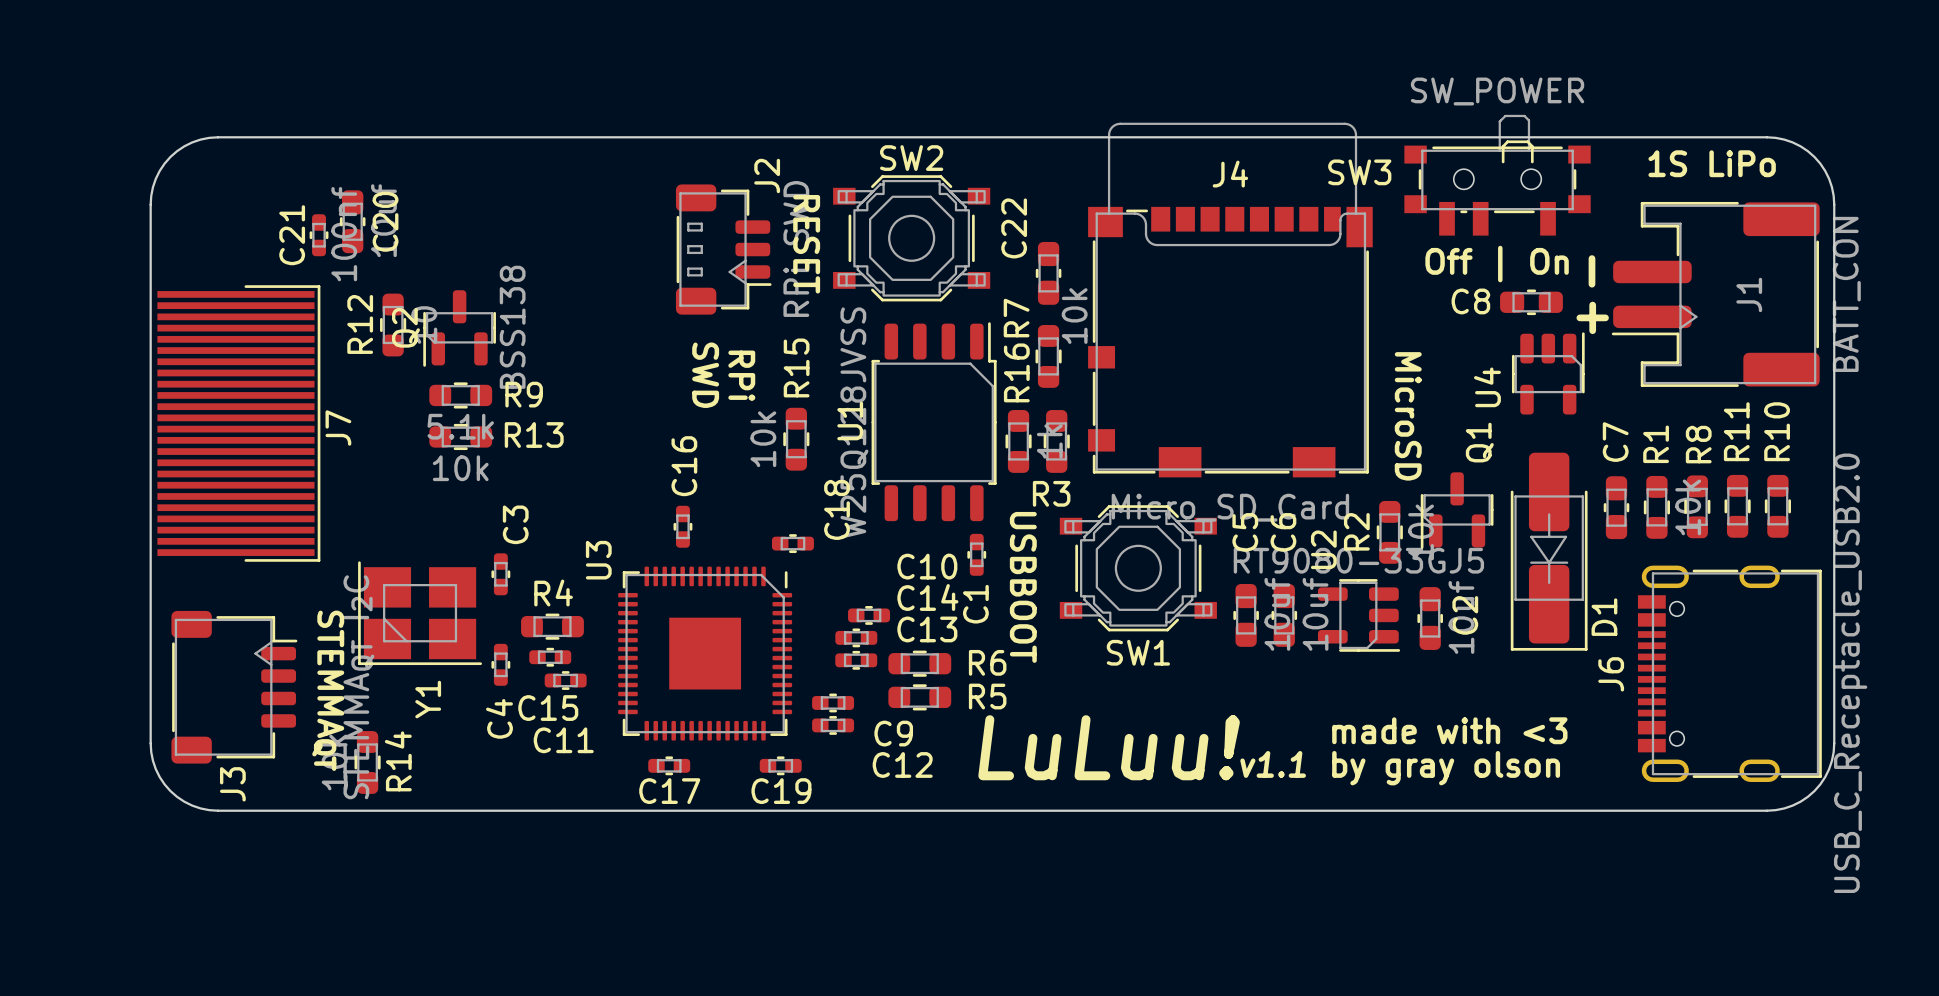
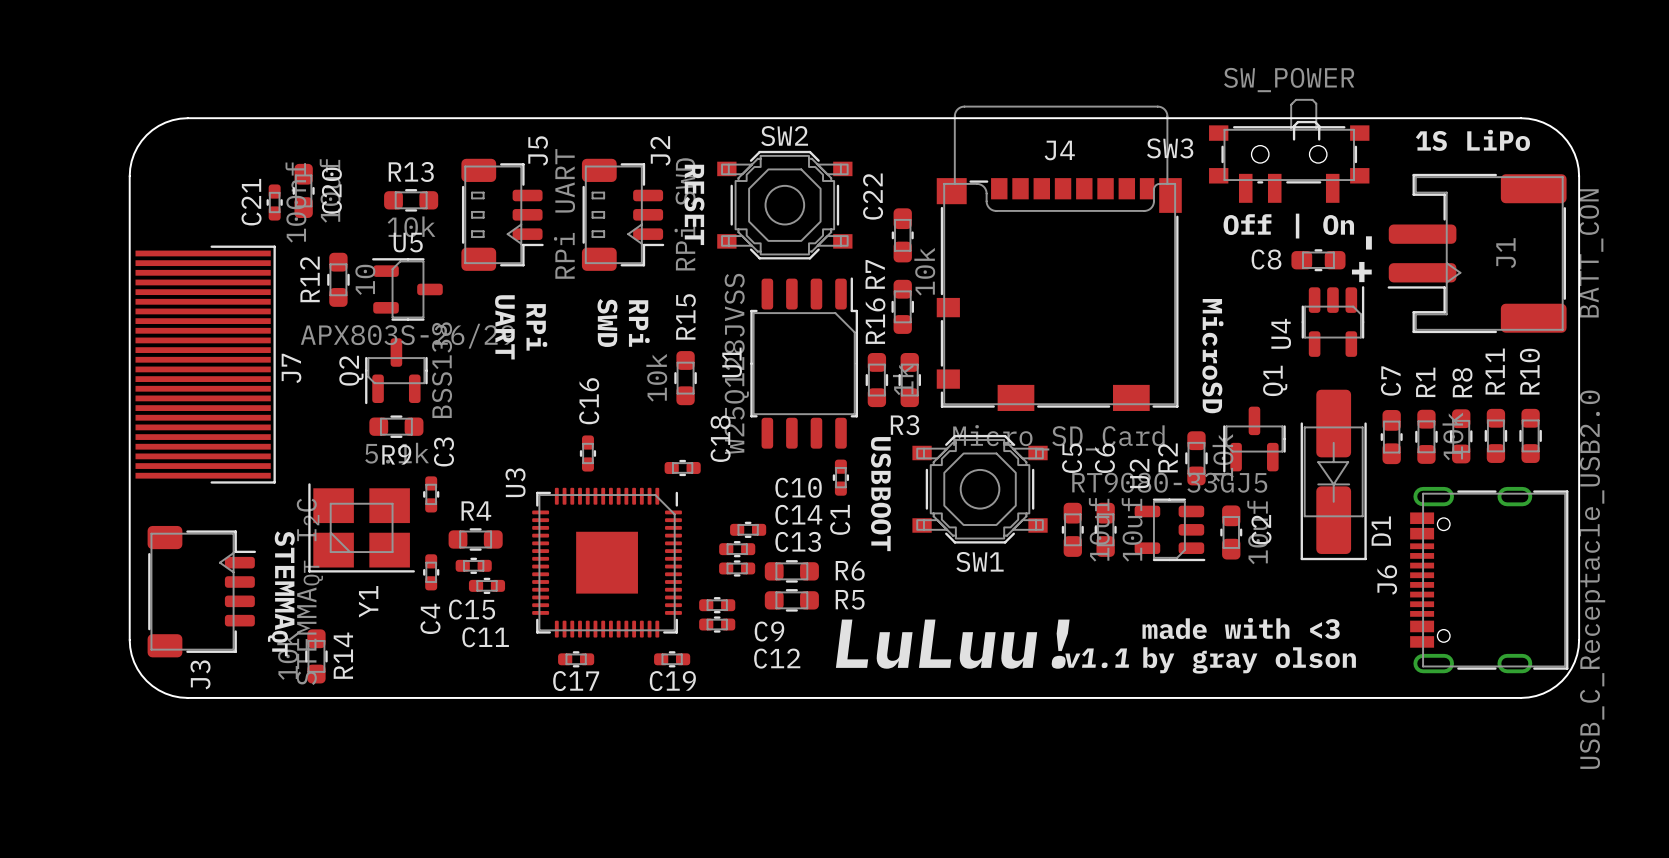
J5: none -> RPi UART (502, 214)
Q2 position: (459, 328) -> (396, 371)
U5: none -> APX803S-26/29 (407, 289)
text: none -> RPi (536, 327)
text: none -> UART (504, 327)
R9 name position: R9 (524, 394) -> R9 (396, 454)
R9 position: (460, 395) -> (396, 426)
R13 name position: R13 (534, 435) -> R13 (411, 171)
R13 position: (460, 436) -> (411, 200)

